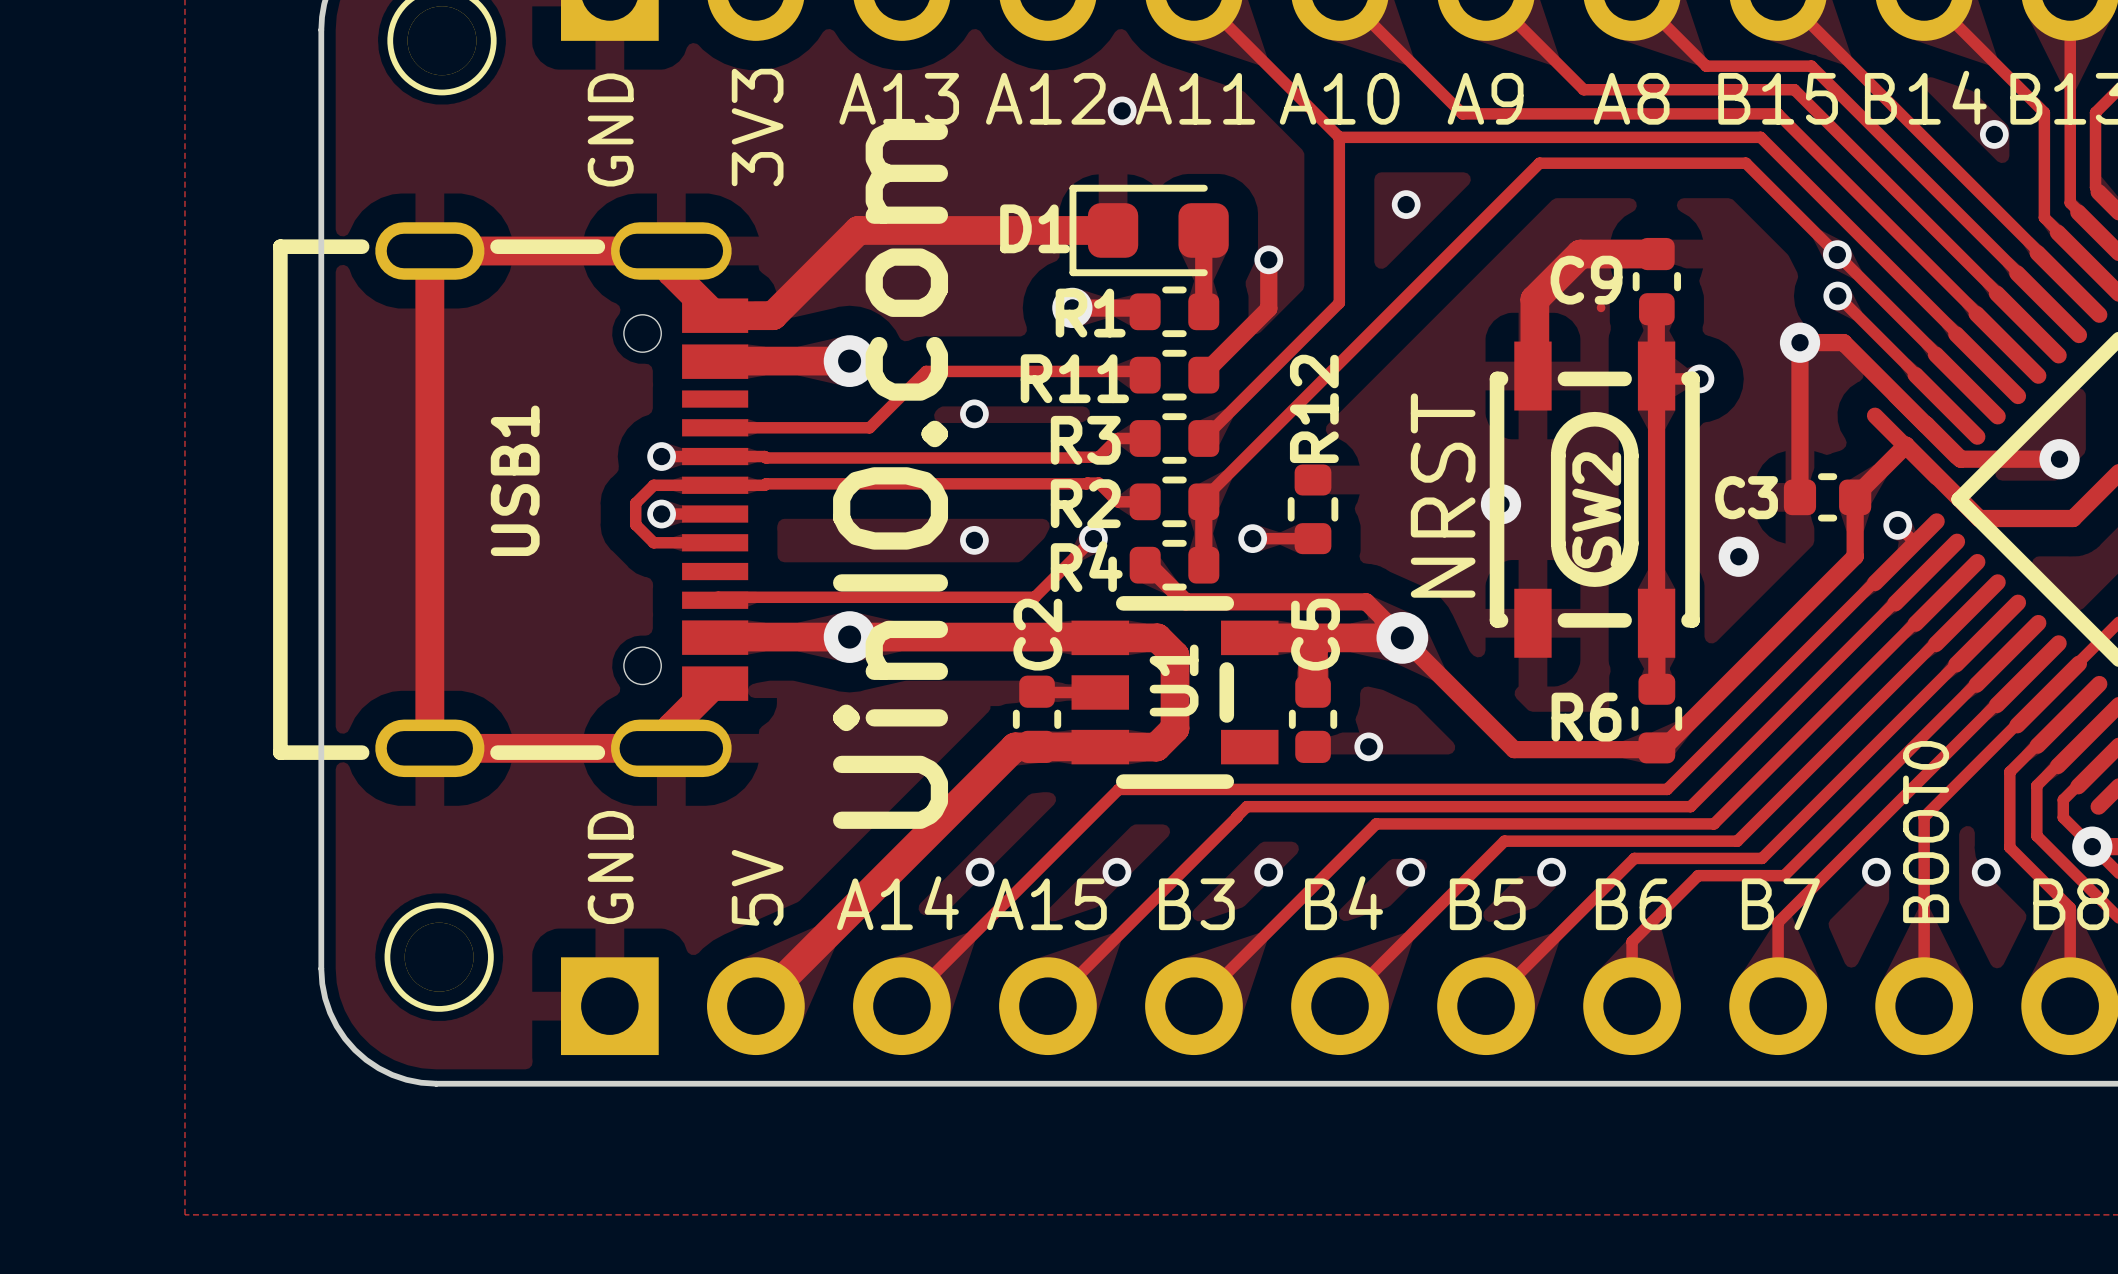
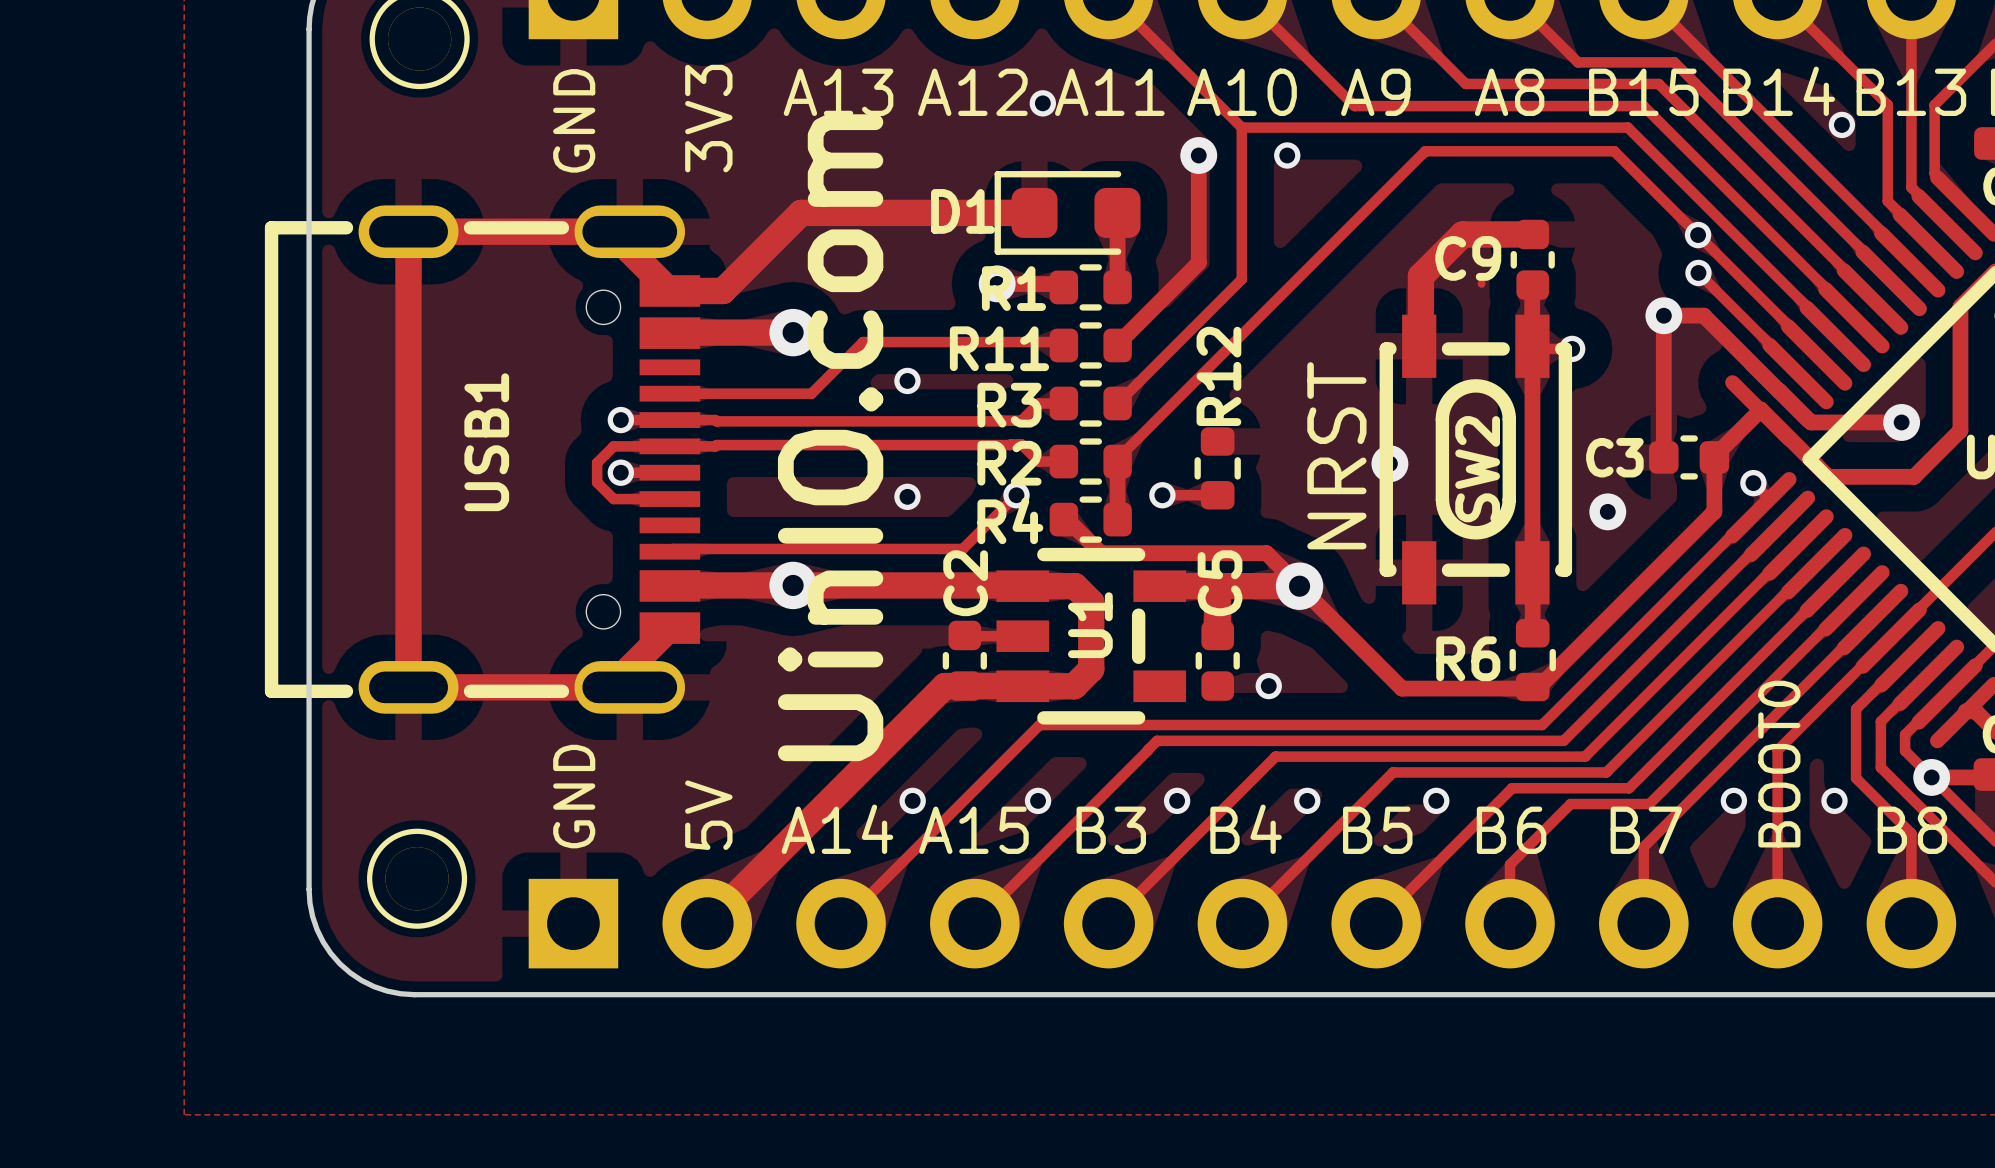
via: none -> (1198, 155)
via position: (1406, 204) -> (1287, 155)
track: (1268, 259) (1268, 308) -> (1198, 155) (1198, 262) (1177, 284)
via: (1268, 259) -> none

